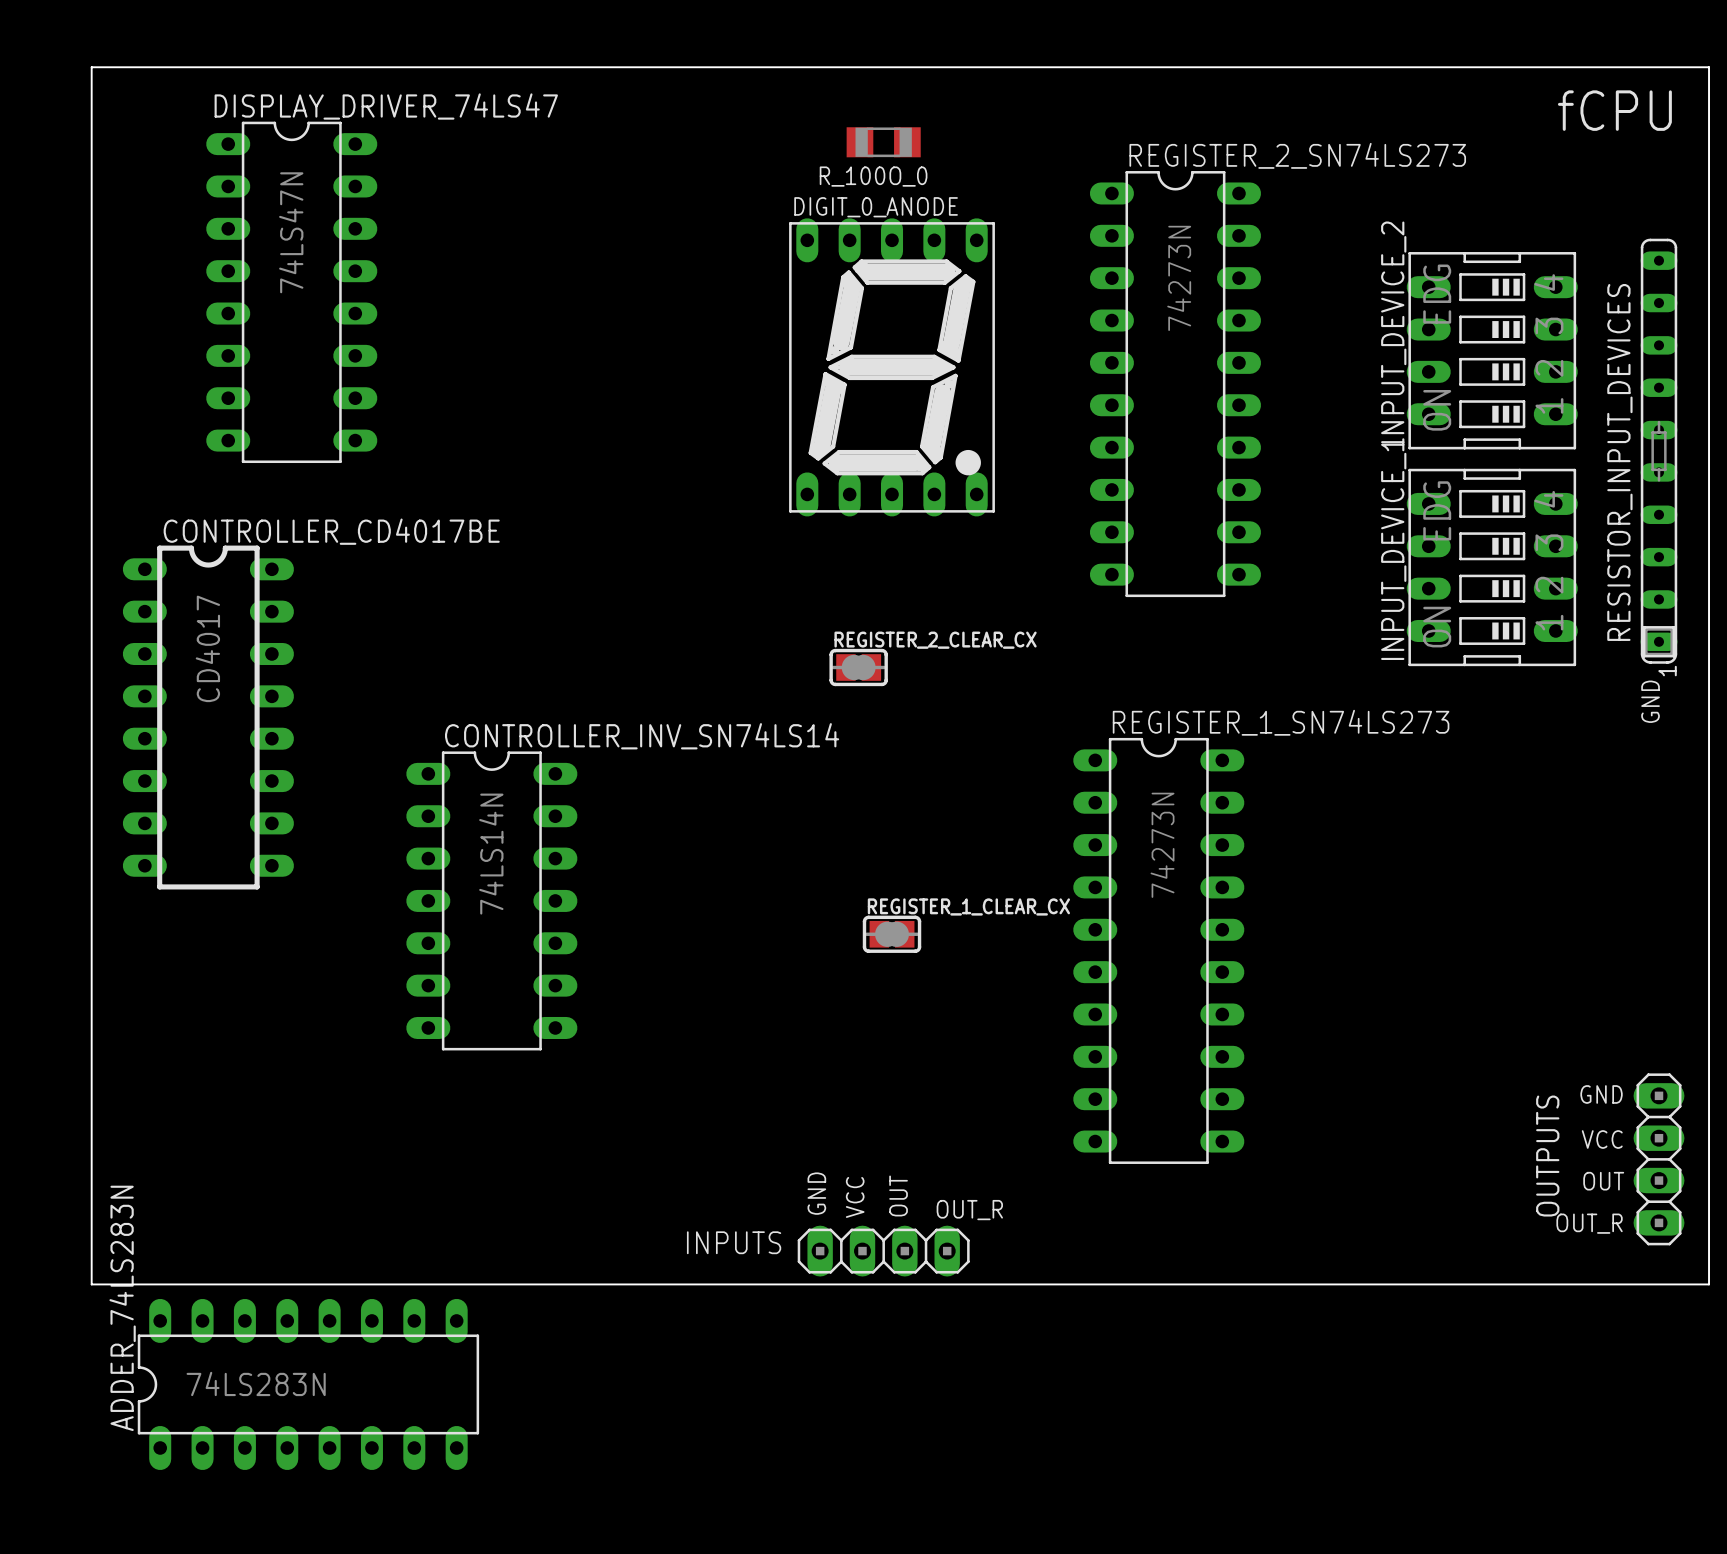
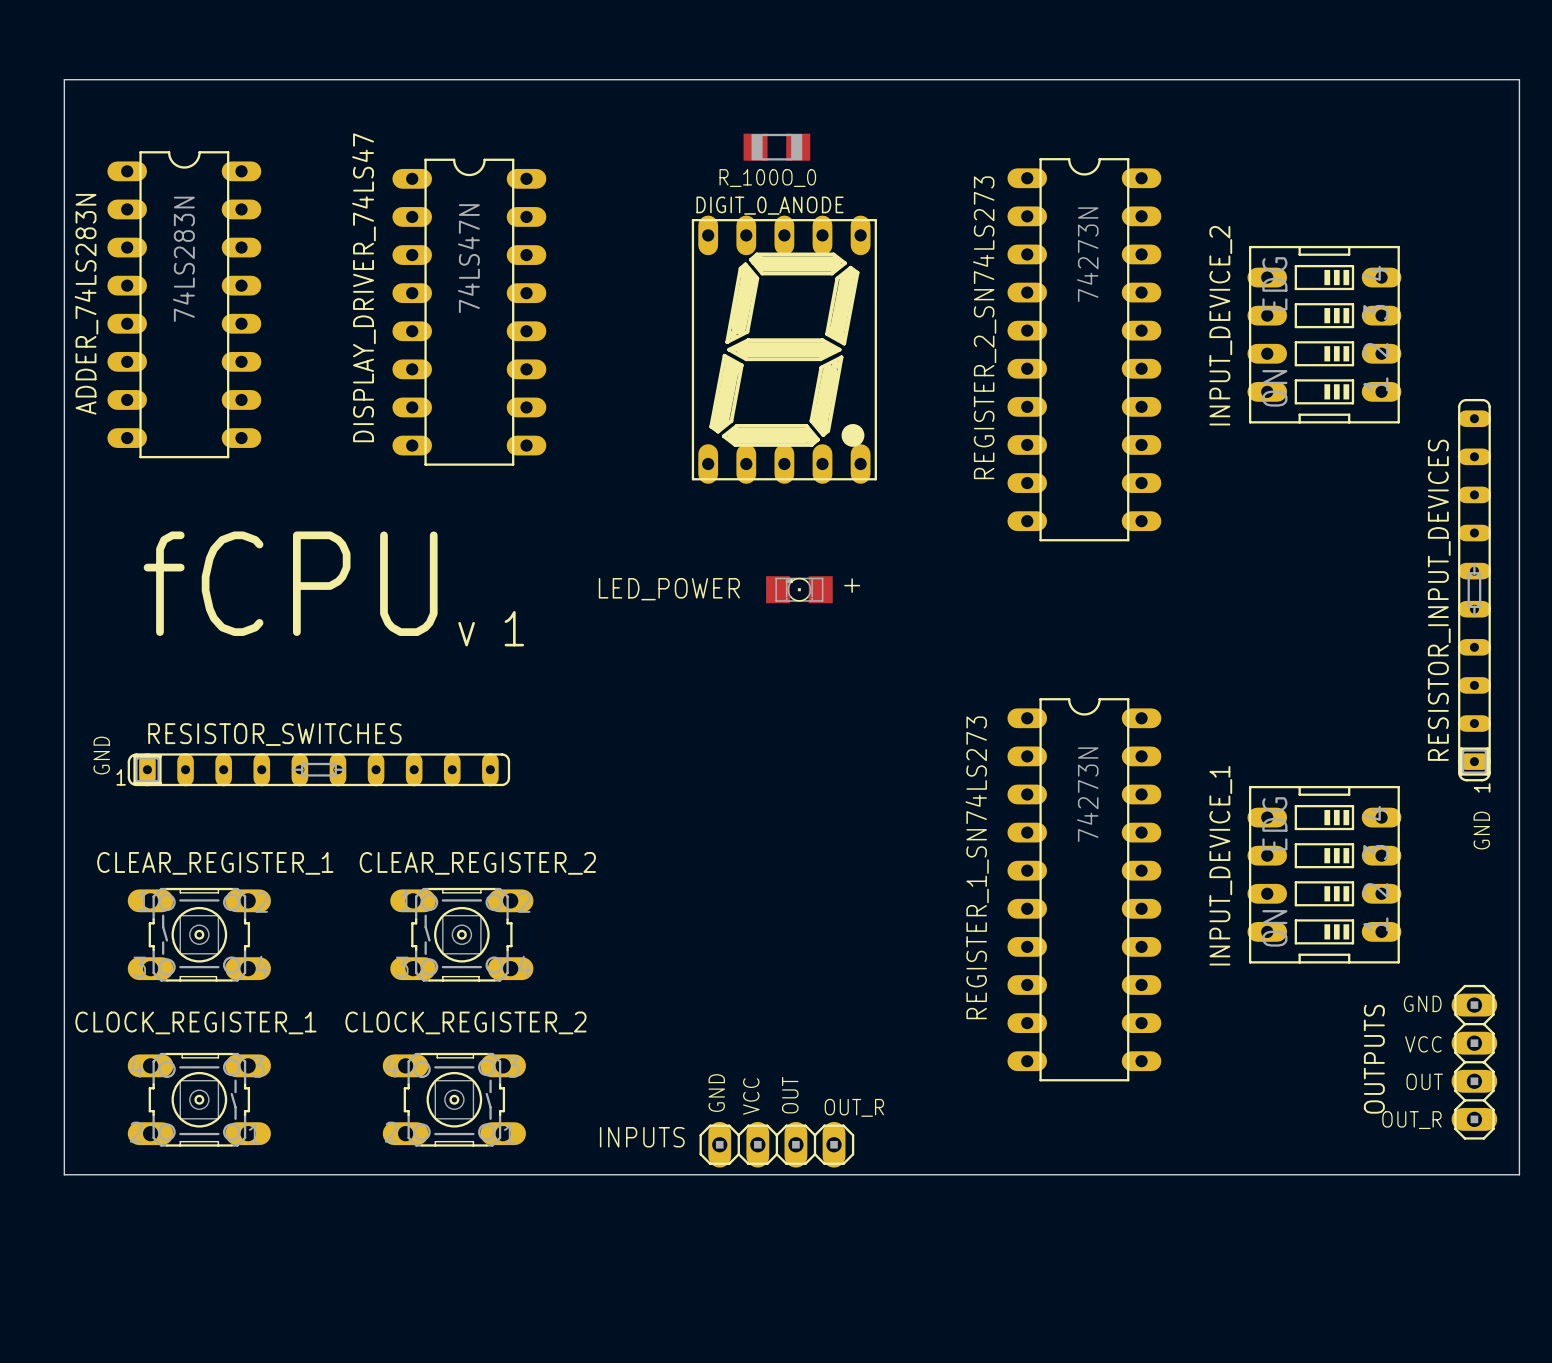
DISPLAY_DRIVER_74LS47 name rotation: 0° (386, 106) -> 90° counterclockwise (363, 287)
text: fCPU (1614, 110) -> none
REGISTER_2_SN74LS273 name rotation: 0° (1297, 155) -> 90° counterclockwise (984, 327)
DISPLAY_DRIVER_74LS47 position: (291, 292) -> (469, 312)
INPUT_DEVICE_2 name position: INPUT_DEVICE_2 (1393, 332) -> INPUT_DEVICE_2 (1220, 325)
REGISTER_2_SN74LS273 position: (1175, 384) -> (1084, 349)
RESISTOR_INPUT_DEVICES position: (1659, 451) -> (1474, 590)
INPUT_DEVICE_1 name position: INPUT_DEVICE_1 (1393, 549) -> INPUT_DEVICE_1 (1220, 865)
INPUT_DEVICE_1 position: (1492, 567) -> (1324, 874)
text: none -> fCPU (290, 583)
text: none -> + (852, 585)
LED_POWER: none -> (799, 589)
REGISTER_2_CLEAR_CX: (858, 667) -> none
text: none -> v 1 (491, 628)
text position: GND (1650, 701) -> GND (1481, 830)
CONTROLLER_CD4017BE: CD4017 (208, 717) -> none
REGISTER_1_SN74LS273 name rotation: 0° (1281, 722) -> 90° counterclockwise (977, 867)
text: none -> GND (101, 755)
RESISTOR_SWITCHES: none -> (318, 769)
CONTROLLER_INV_SN74LS14: 74LS14N (491, 900) -> none
REGISTER_1_CLEAR_CX: (892, 934) -> none
REGISTER_1_SN74LS273 position: (1158, 950) -> (1084, 889)
CLEAR_REGISTER_1: none -> (199, 934)
CLEAR_REGISTER_2: none -> (461, 934)
CLOCK_REGISTER_1: none -> (199, 1099)
CLOCK_REGISTER_2: none -> (454, 1099)
ADDER_74LS283N name position: ADDER_74LS283N (122, 1308) -> ADDER_74LS283N (86, 304)
ADDER_74LS283N rotation: 0° (308, 1384) -> 90° clockwise (184, 304)
ADDER_74LS283N position: (308, 1384) -> (184, 304)

